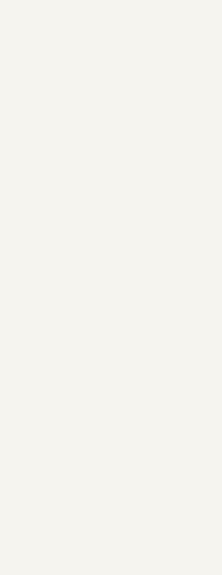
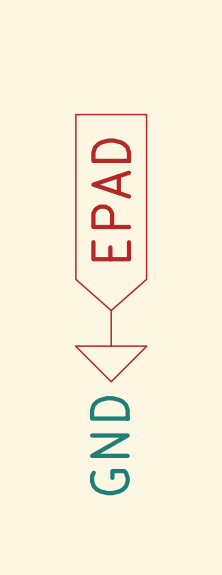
global label: none -> EPAD (111, 199)
power symbol: none -> GND (111, 346)

